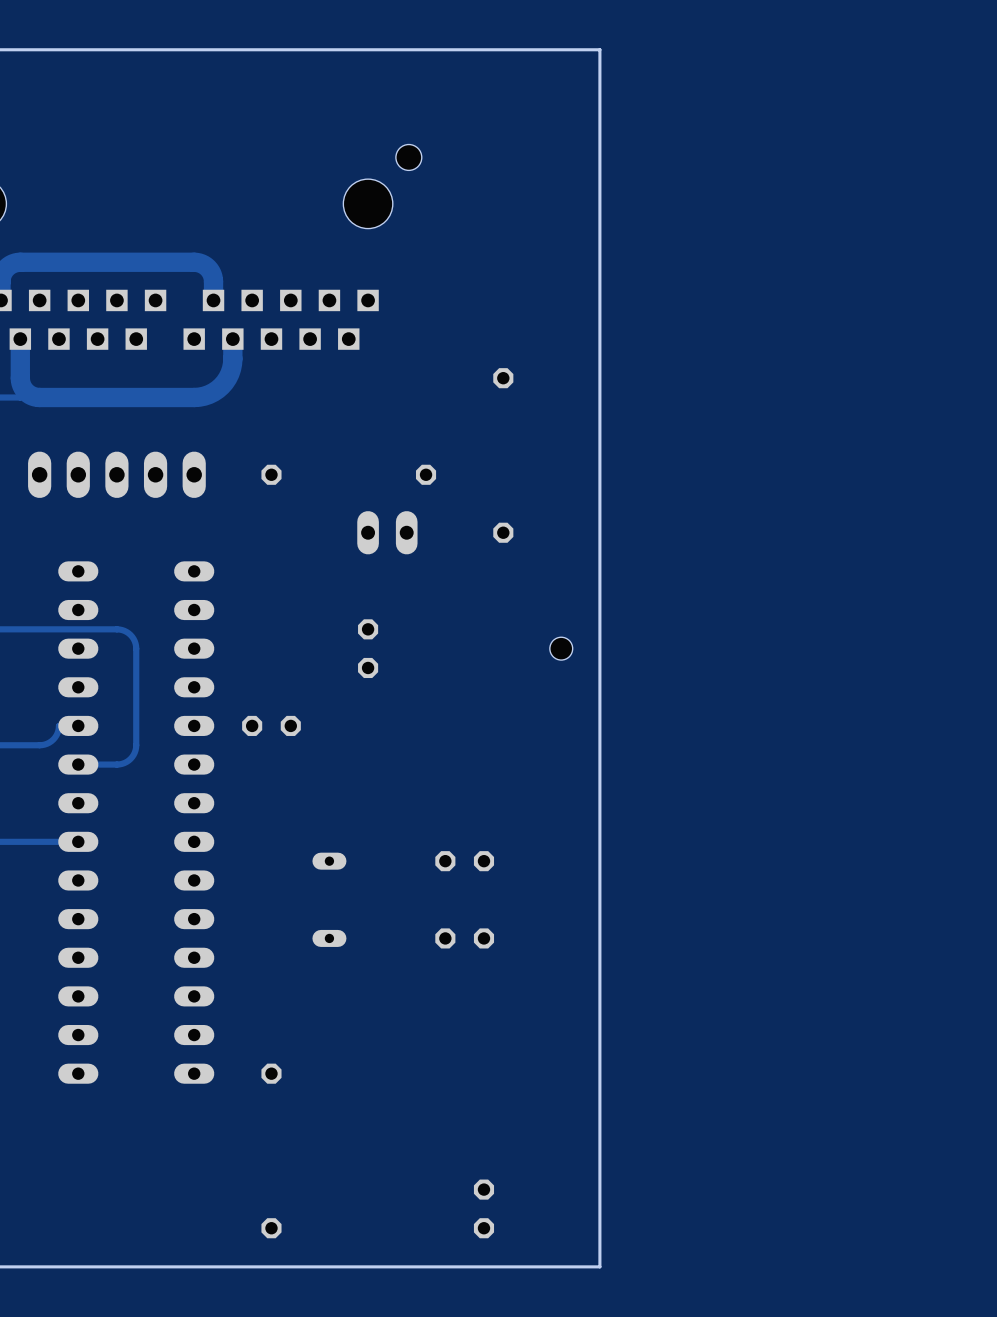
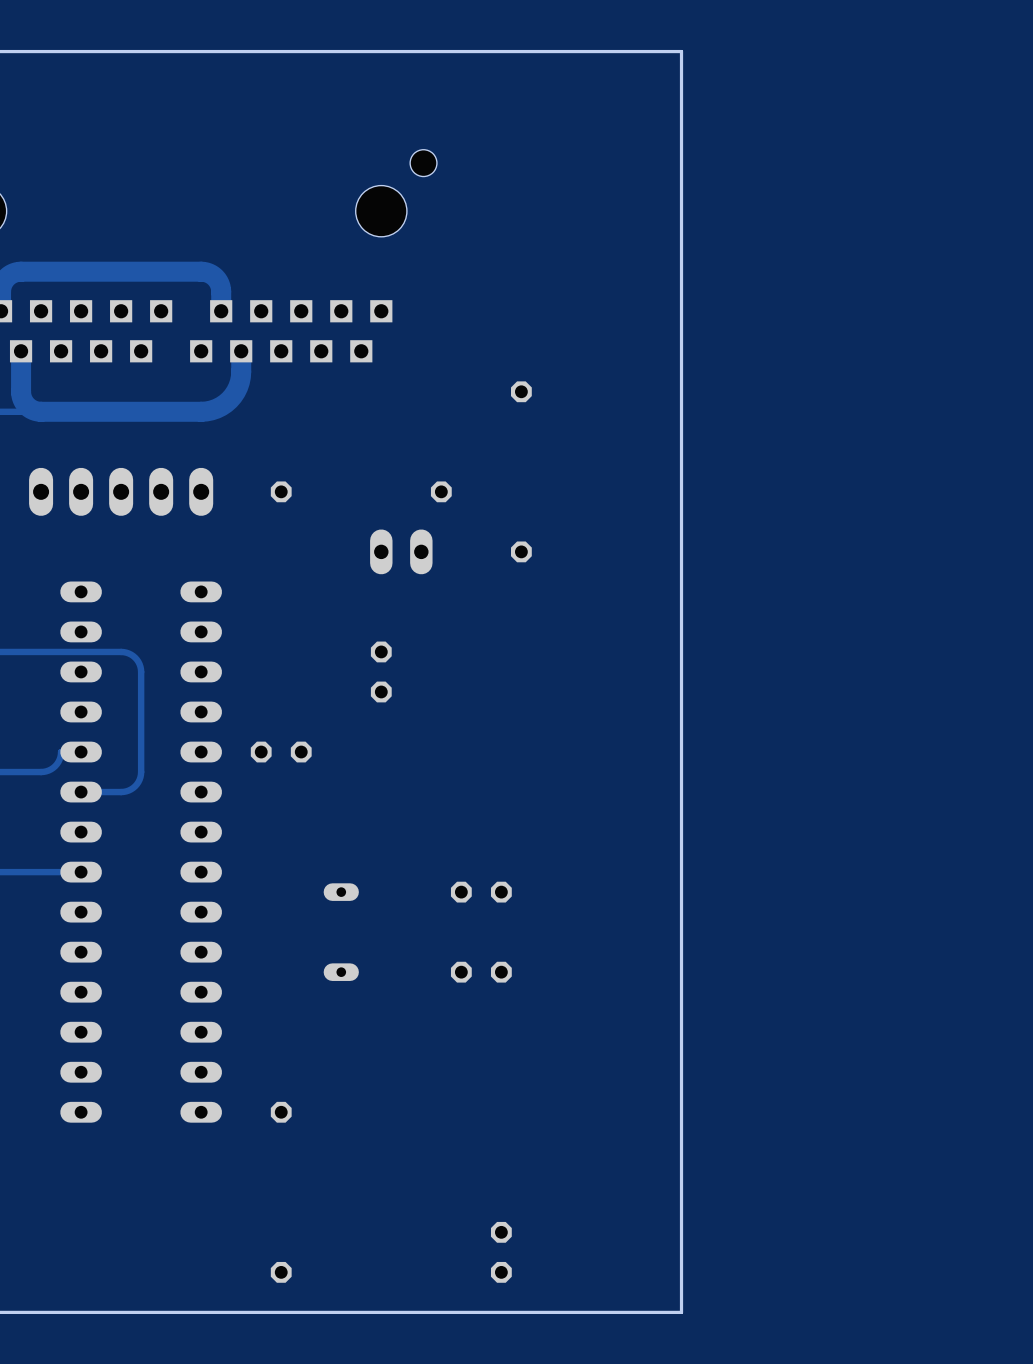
board edge: (599, 49) (599, 1266) -> (621, 51) (681, 51) (681, 1312) (621, 1312)
hole: (561, 648) -> none

